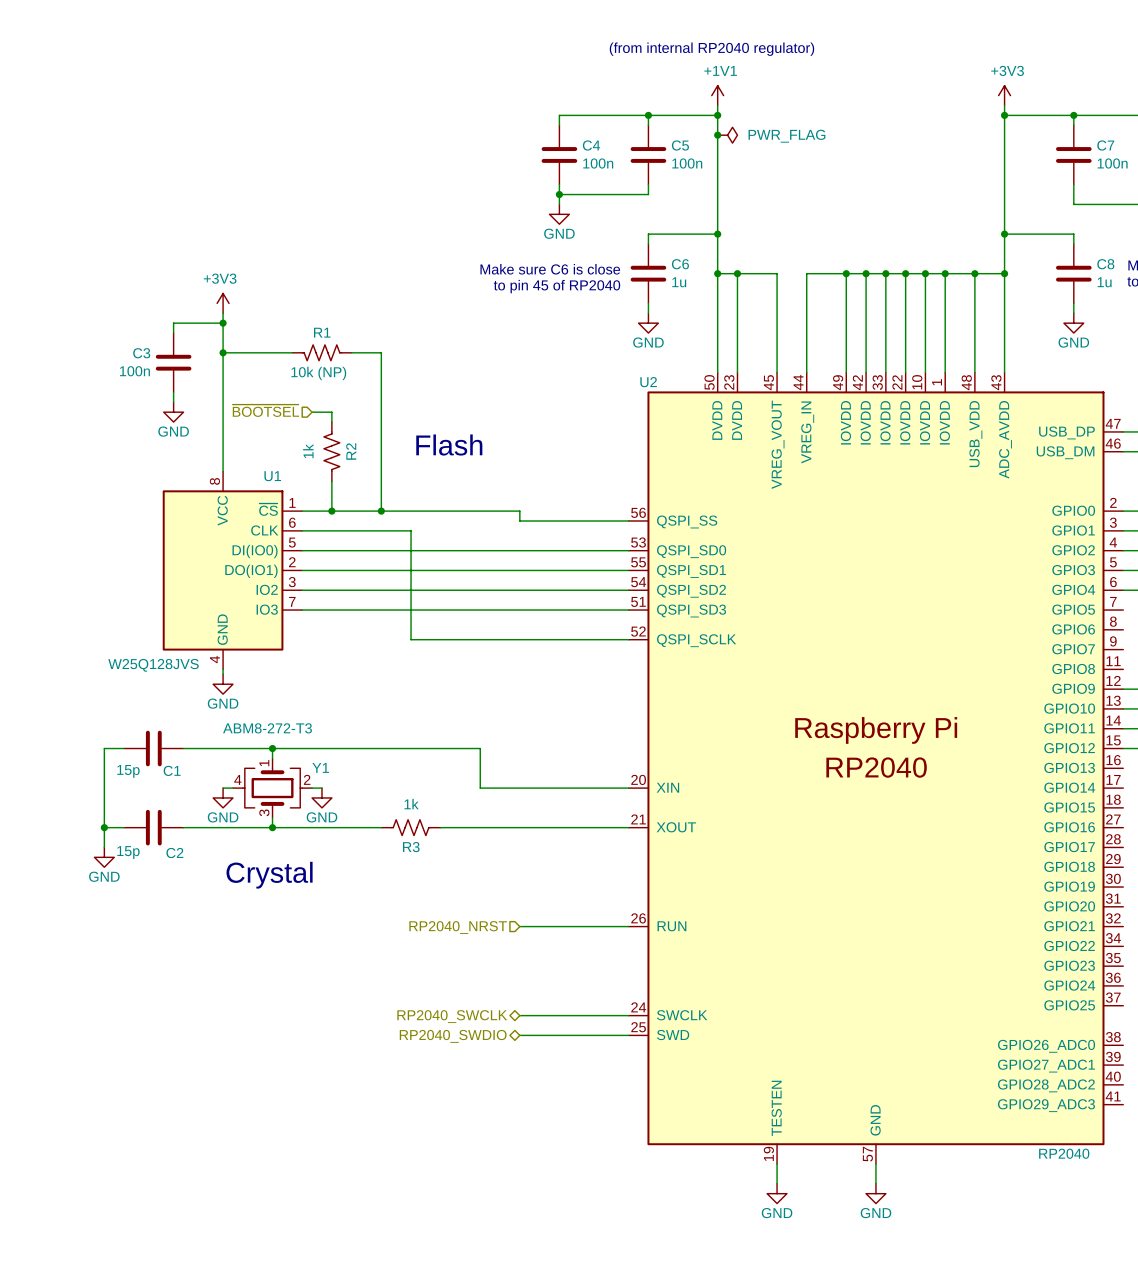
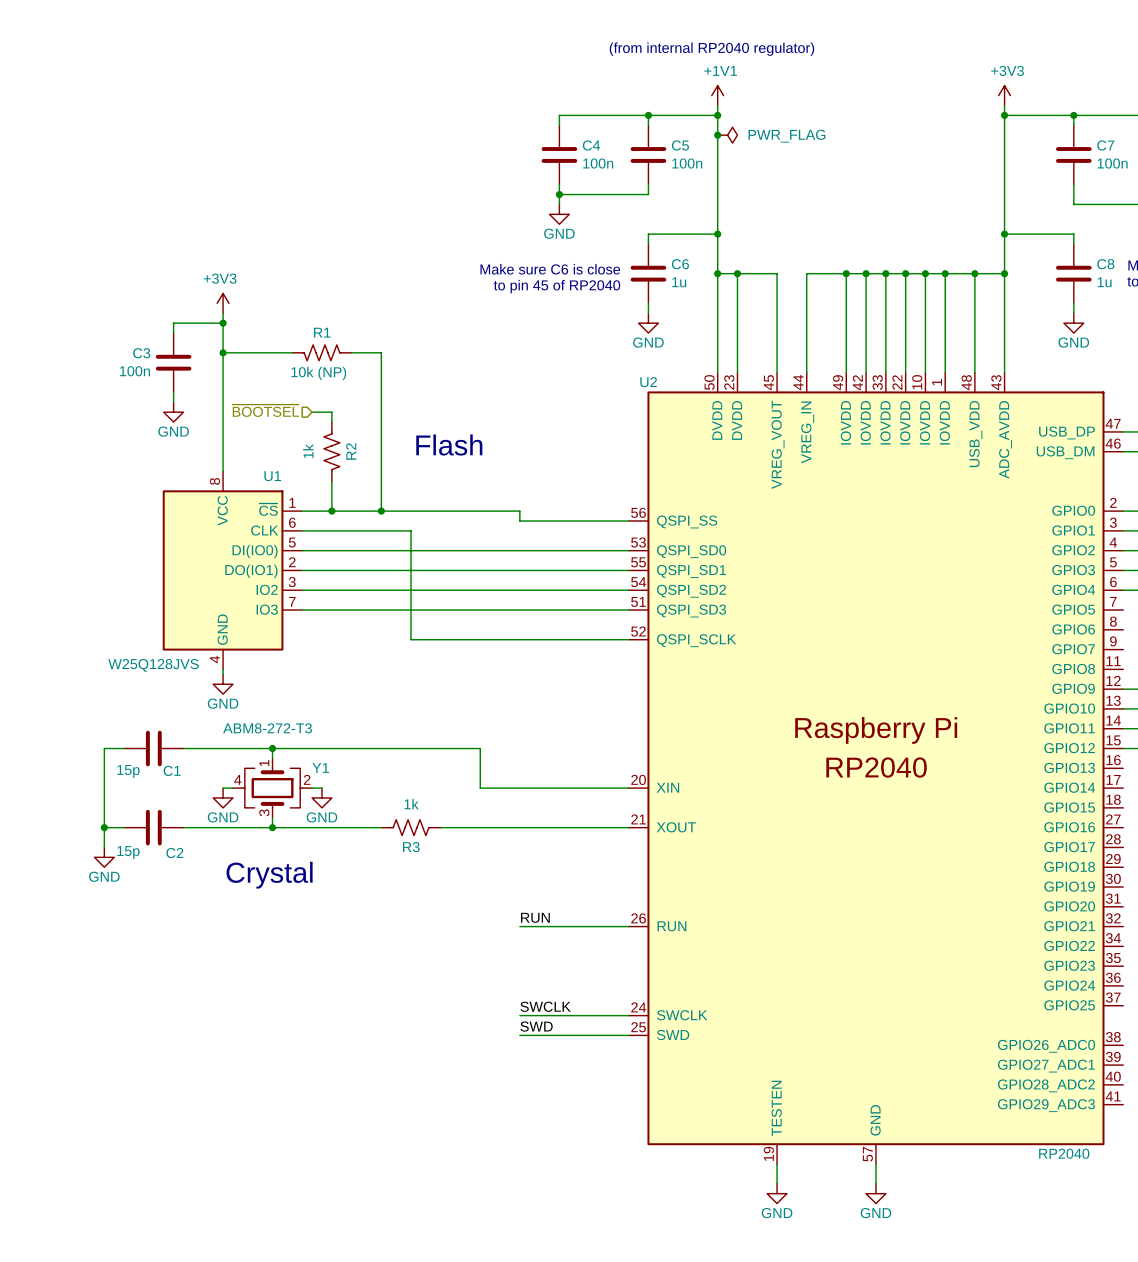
label: none -> RUN (535, 917)
hierarchical label: RP2040_NRST (458, 927) -> none
label: none -> SWCLK (545, 1006)
hierarchical label: RP2040_SWCLK (452, 1016) -> none
label: none -> SWD (536, 1026)
hierarchical label: RP2040_SWDIO (453, 1036) -> none

